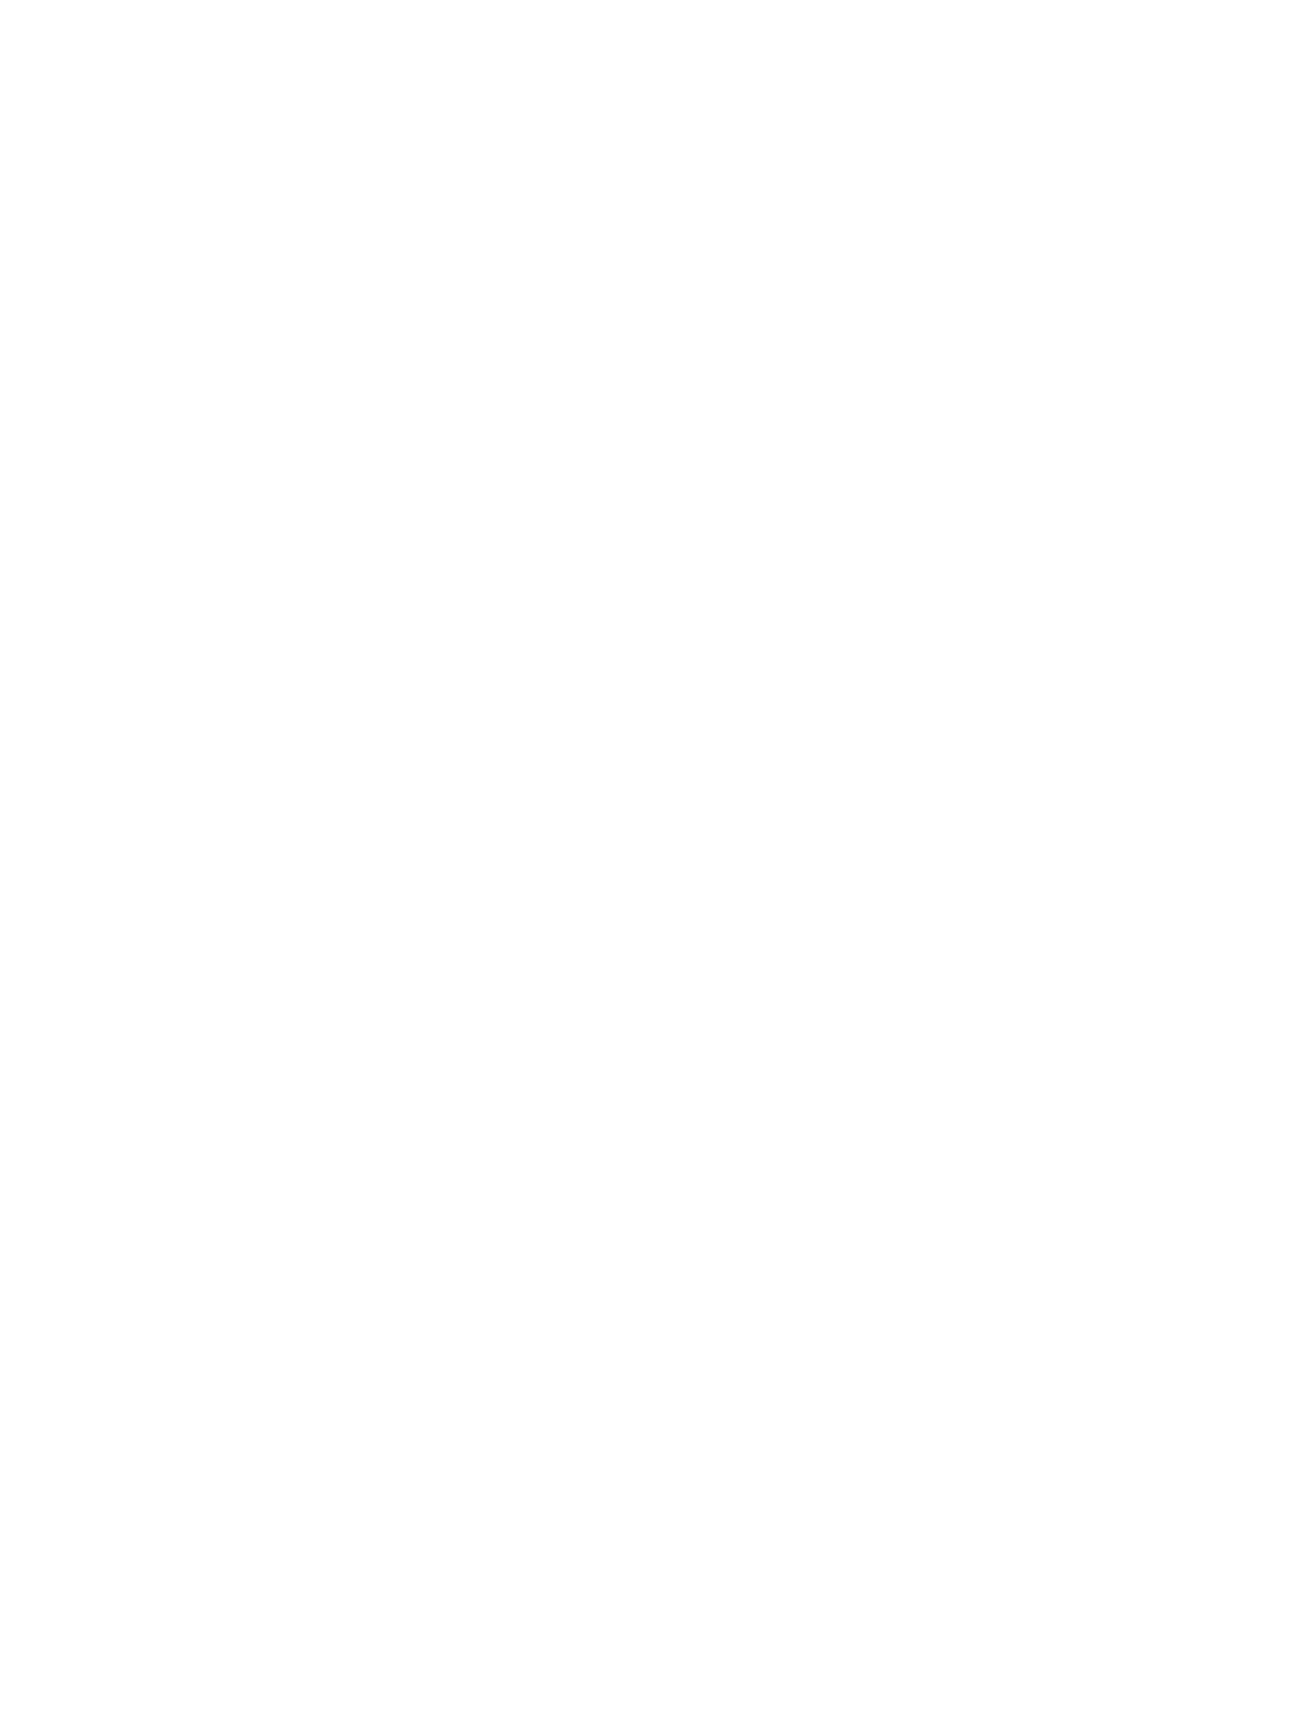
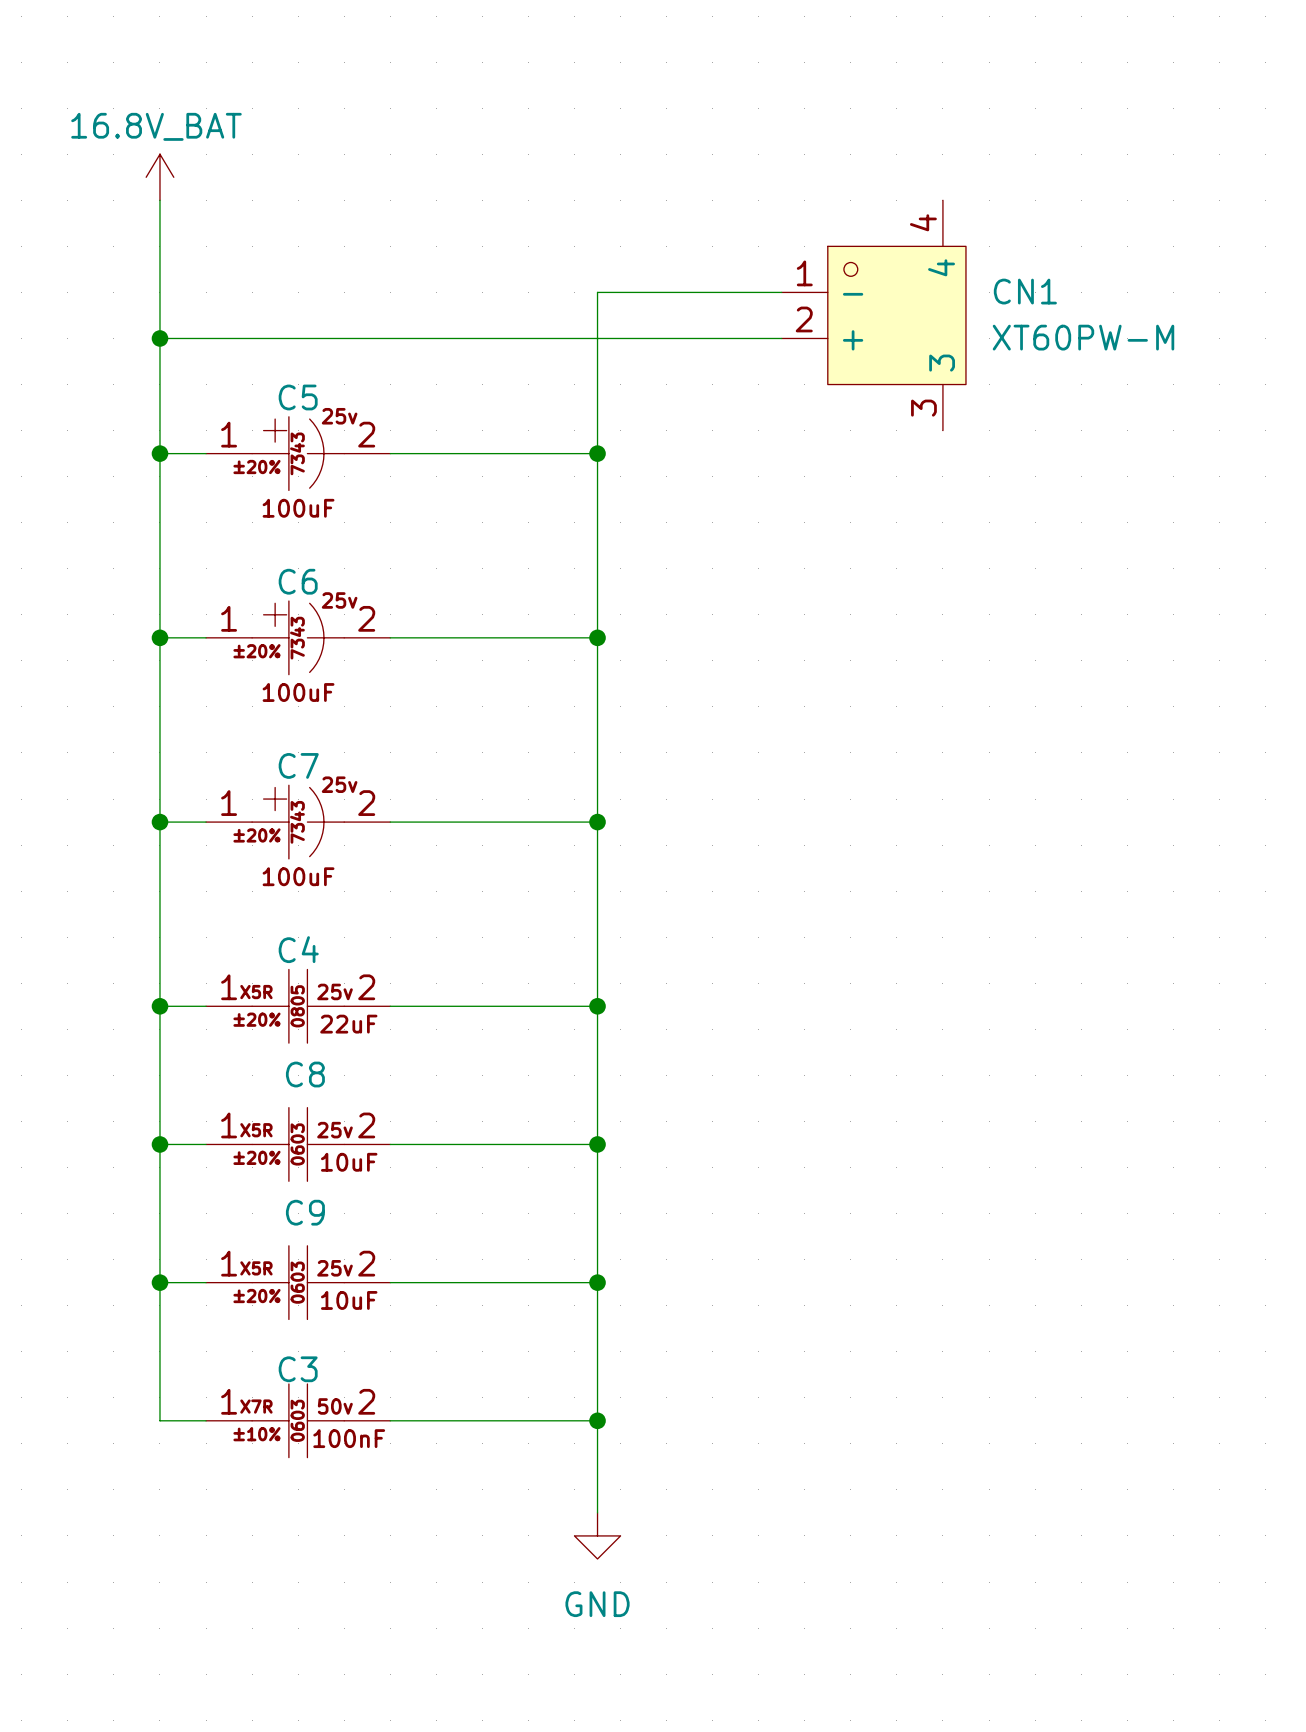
power symbol: none -> 16.8V_BAT (159, 177)
wire: none -> (159, 200) (159, 1420) (206, 1420)
wire: none -> (781, 292) (597, 292) (597, 1512)
CN1: none -> XT60PW-M (873, 315)
wire: none -> (159, 338) (781, 338)
junction: none -> (159, 338)
wire: none -> (159, 453) (206, 453)
junction: none -> (159, 453)
C5: none -> (298, 453)
wire: none -> (390, 453) (597, 453)
junction: none -> (597, 453)
wire: none -> (159, 637) (206, 637)
junction: none -> (159, 637)
C6: none -> (298, 637)
wire: none -> (390, 637) (597, 637)
junction: none -> (597, 637)
wire: none -> (159, 822) (206, 822)
junction: none -> (159, 822)
C7: none -> (298, 822)
wire: none -> (390, 822) (597, 822)
junction: none -> (597, 822)
wire: none -> (159, 1006) (206, 1006)
junction: none -> (159, 1006)
C4: none -> (298, 1006)
wire: none -> (390, 1006) (597, 1006)
junction: none -> (597, 1006)
wire: none -> (159, 1144) (206, 1144)
junction: none -> (159, 1144)
C8: none -> (298, 1144)
wire: none -> (390, 1144) (597, 1144)
junction: none -> (597, 1144)
wire: none -> (159, 1282) (206, 1282)
junction: none -> (159, 1282)
C9: none -> (298, 1282)
wire: none -> (390, 1282) (597, 1282)
junction: none -> (597, 1282)
C3: none -> (298, 1420)
wire: none -> (390, 1420) (597, 1420)
junction: none -> (597, 1420)
power symbol: none -> GND (597, 1535)

